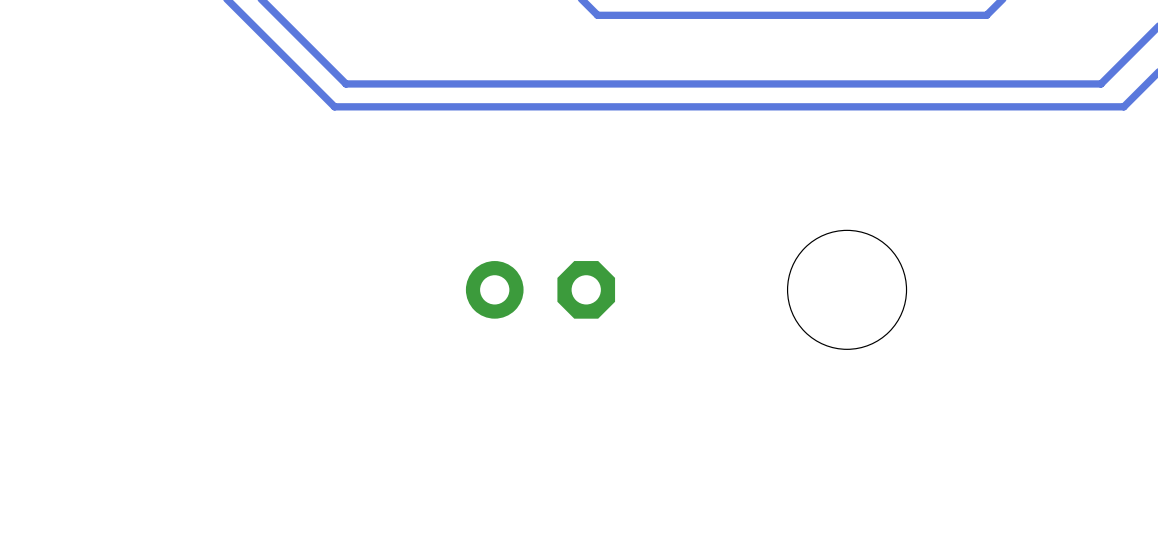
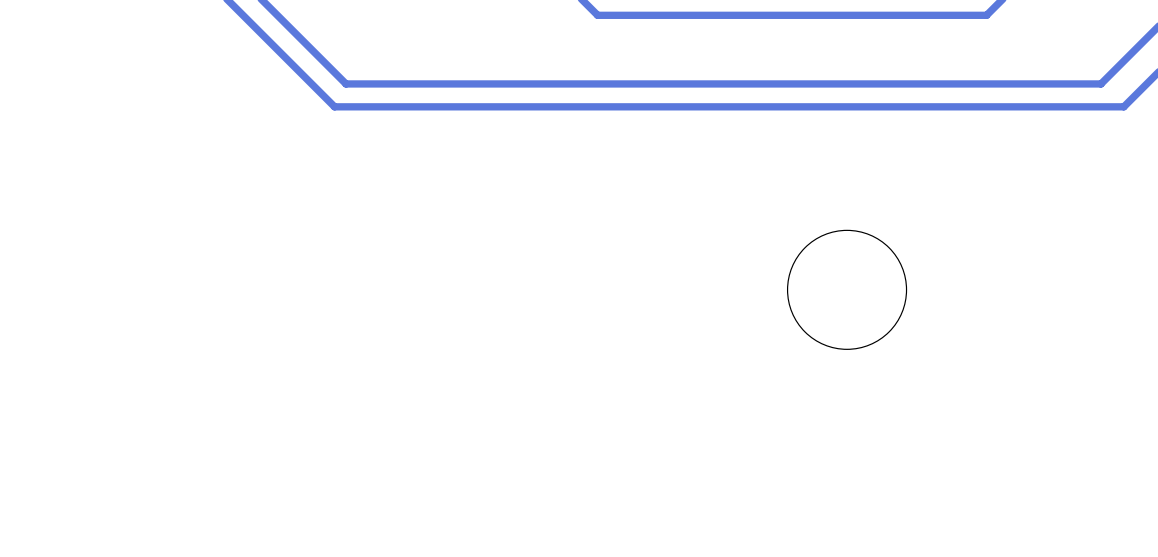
part: (540, 289) -> none

